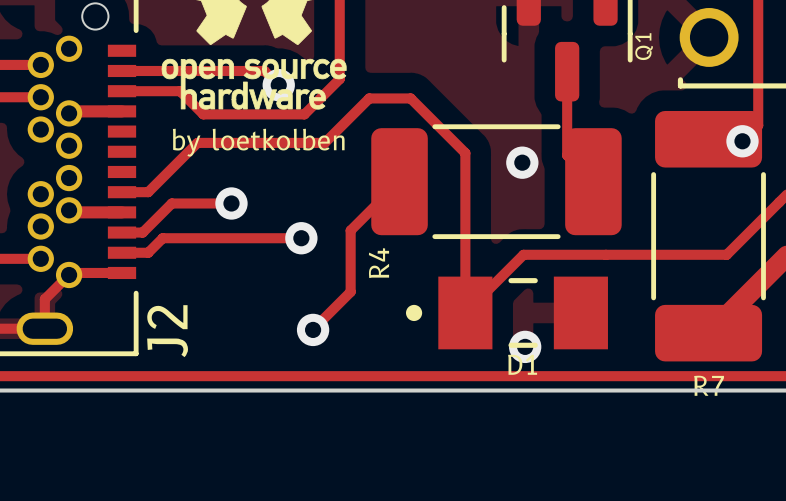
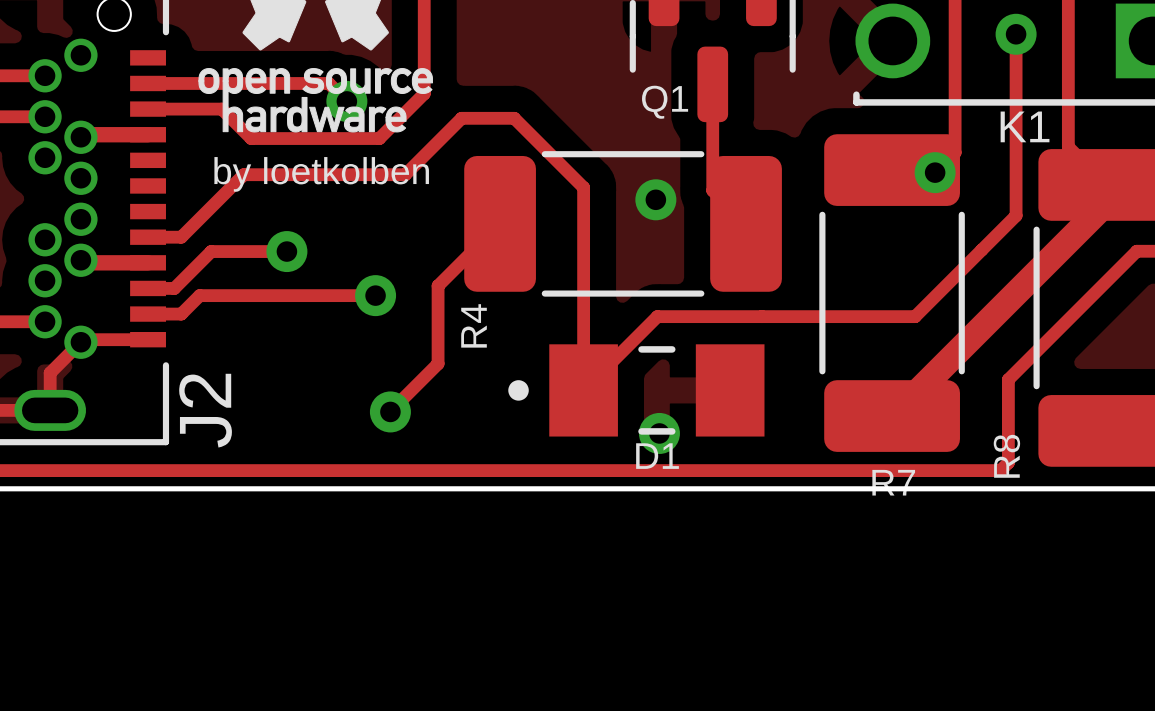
Q1 name rotation: 0° (644, 46) -> 90° clockwise (665, 102)
Q1 name position: Q1 (644, 46) -> Q1 (665, 102)

